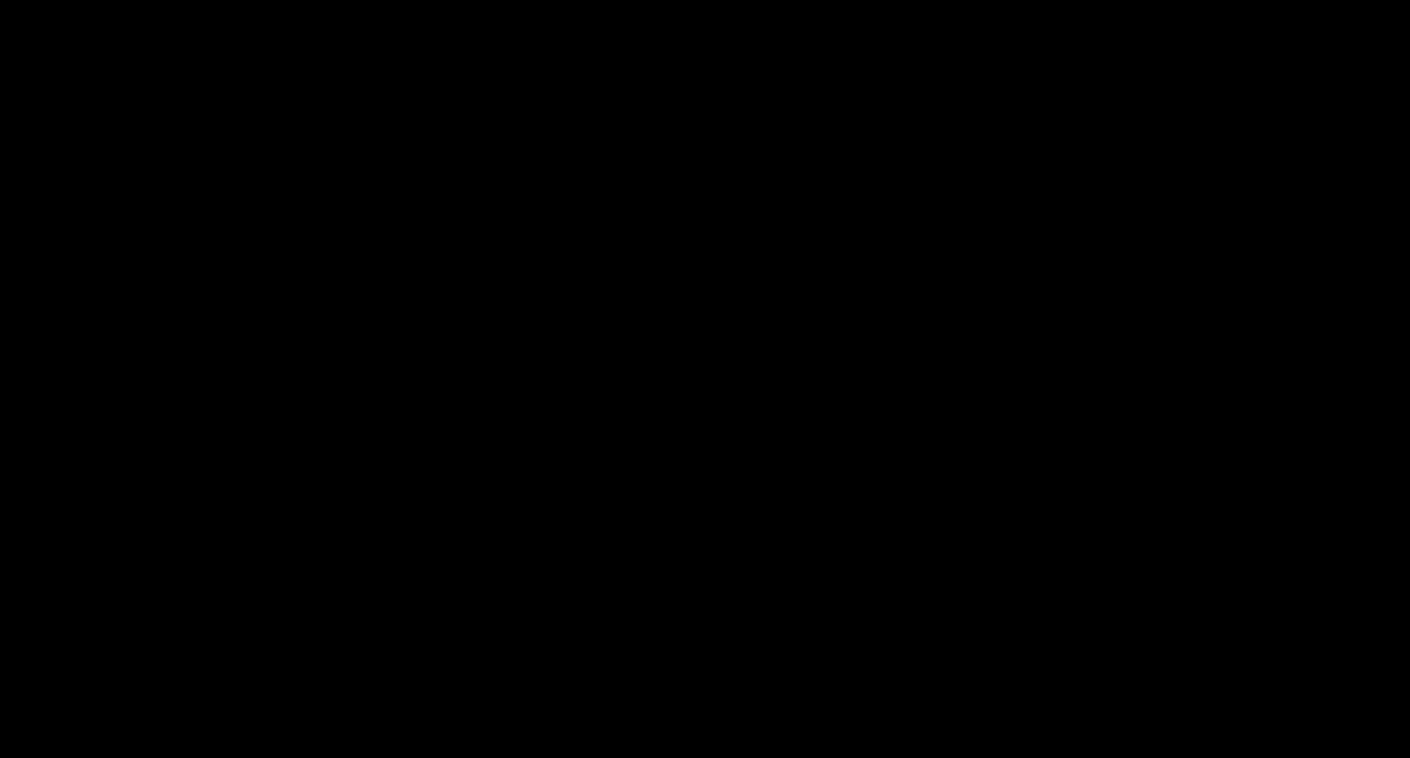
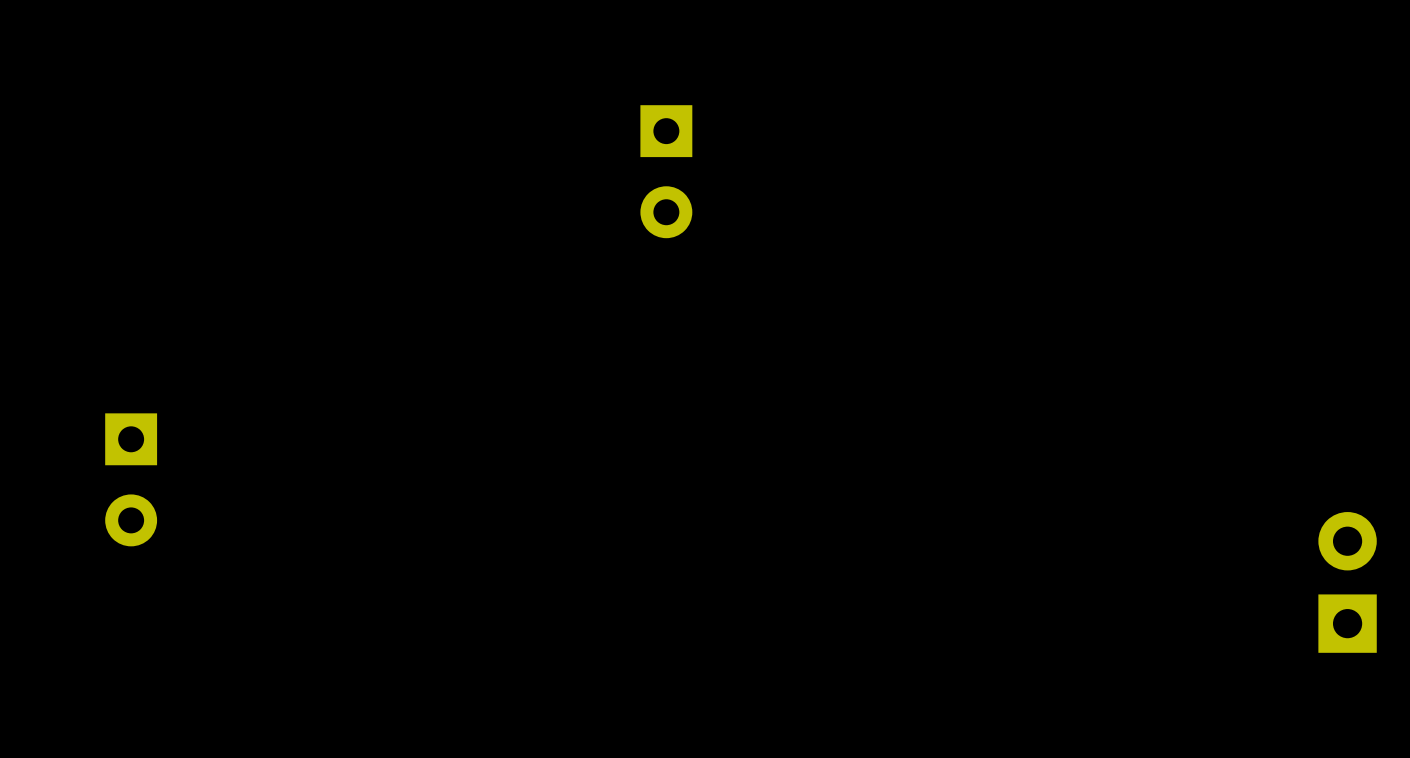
part: none -> (666, 171)
part: none -> (131, 479)
part: none -> (1347, 582)

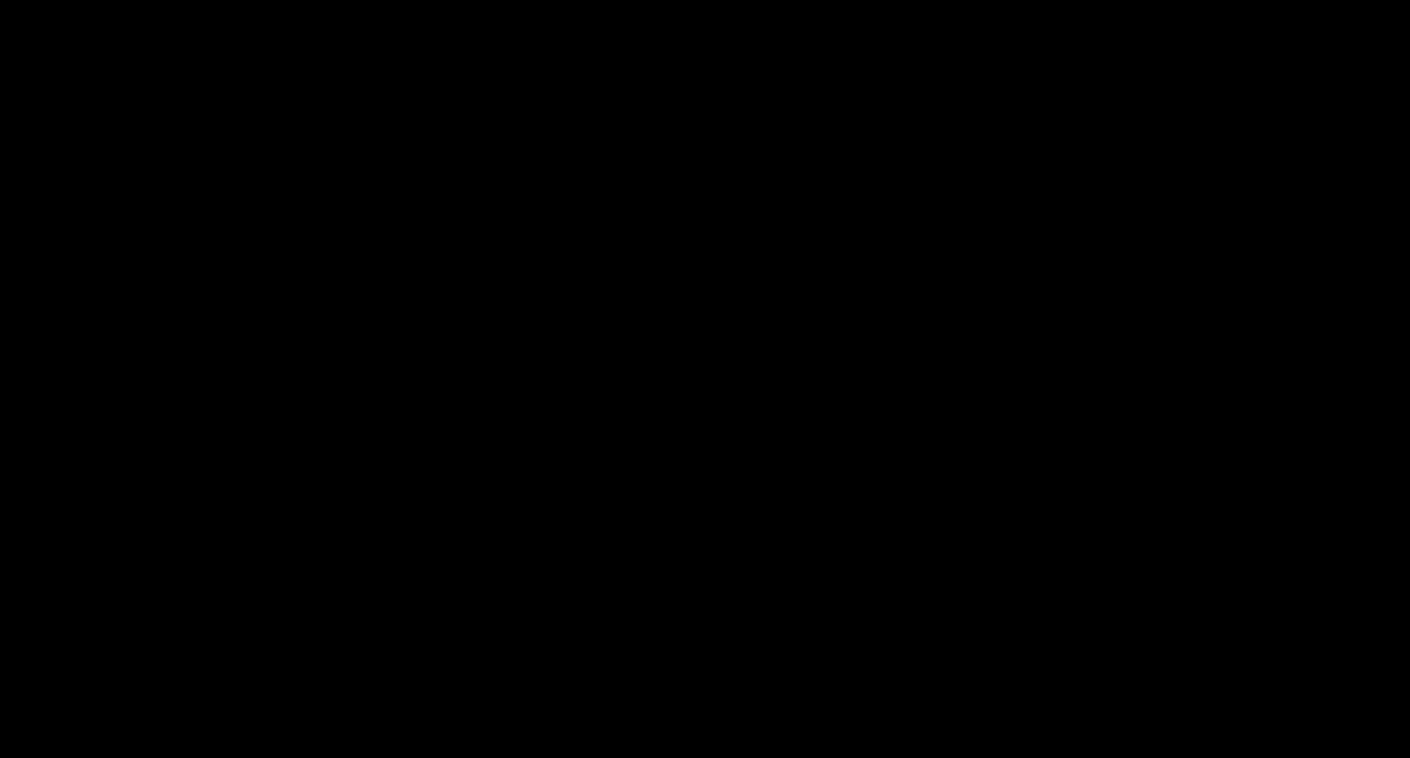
part: (666, 171) -> none
part: (131, 479) -> none
part: (1347, 582) -> none

